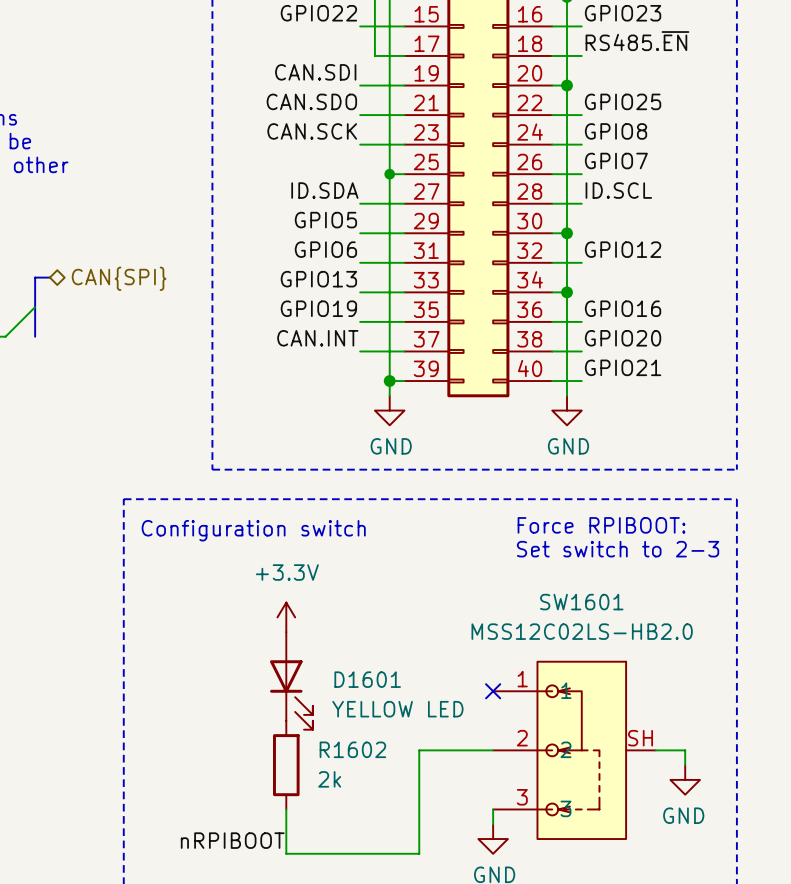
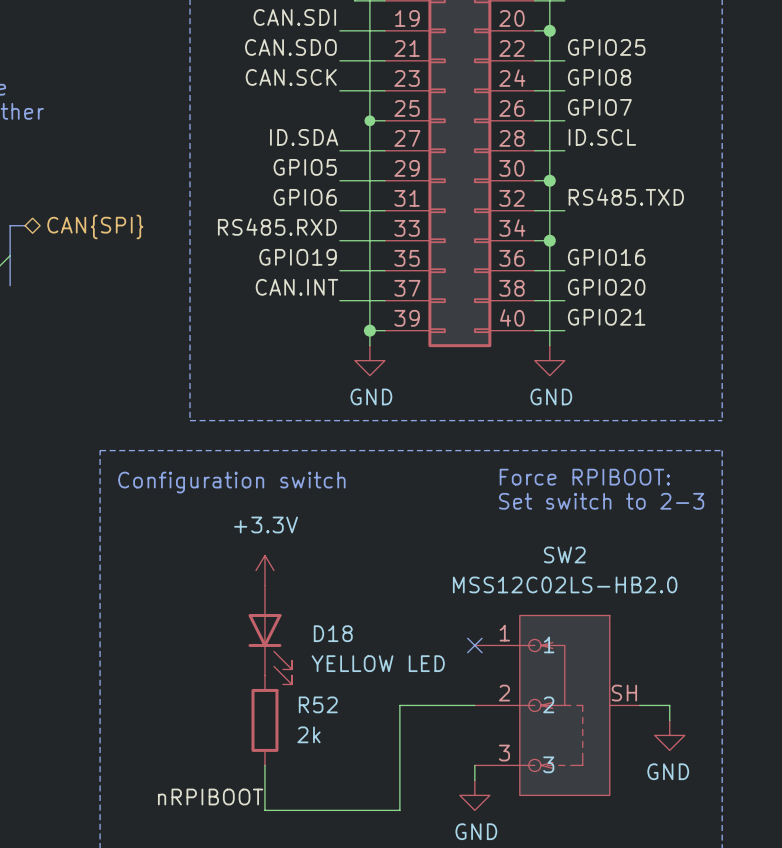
label: GPIO12 (623, 249) -> RS485.TXD (626, 197)
label: GPIO13 (318, 279) -> RS485.RXD (277, 226)
SW1601 name: SW1601 (581, 602) -> SW2 (564, 554)
D1601 name: D1601 (367, 679) -> D18 (333, 633)
R1602 name: R1602 (352, 749) -> R52 (318, 704)

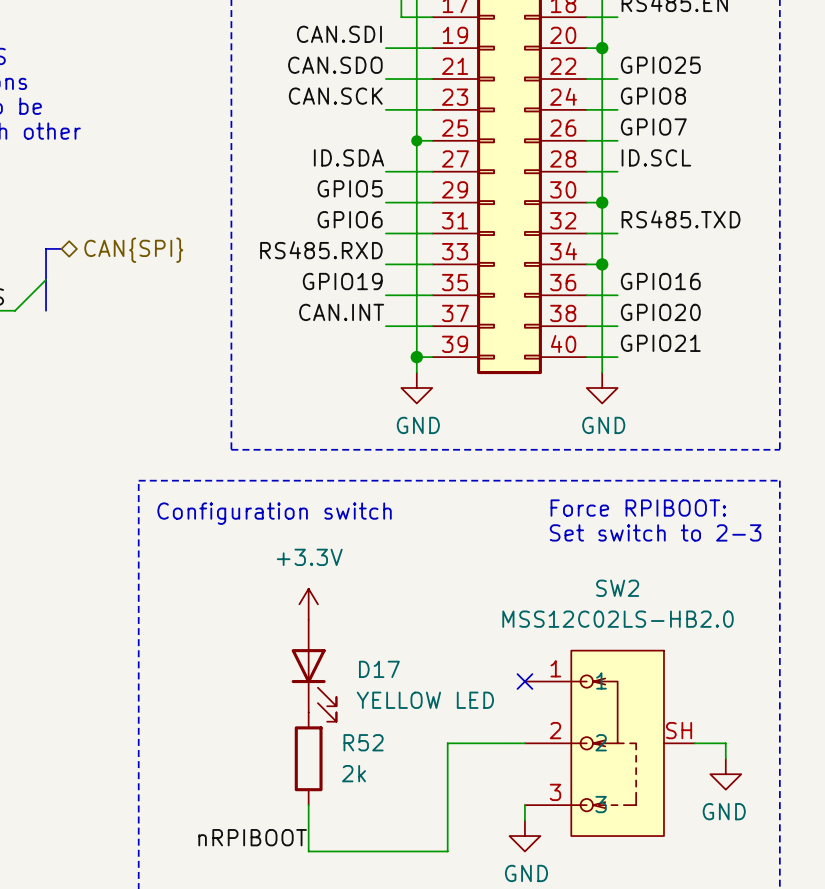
D18 name: D18 (333, 633) -> D17 (379, 669)

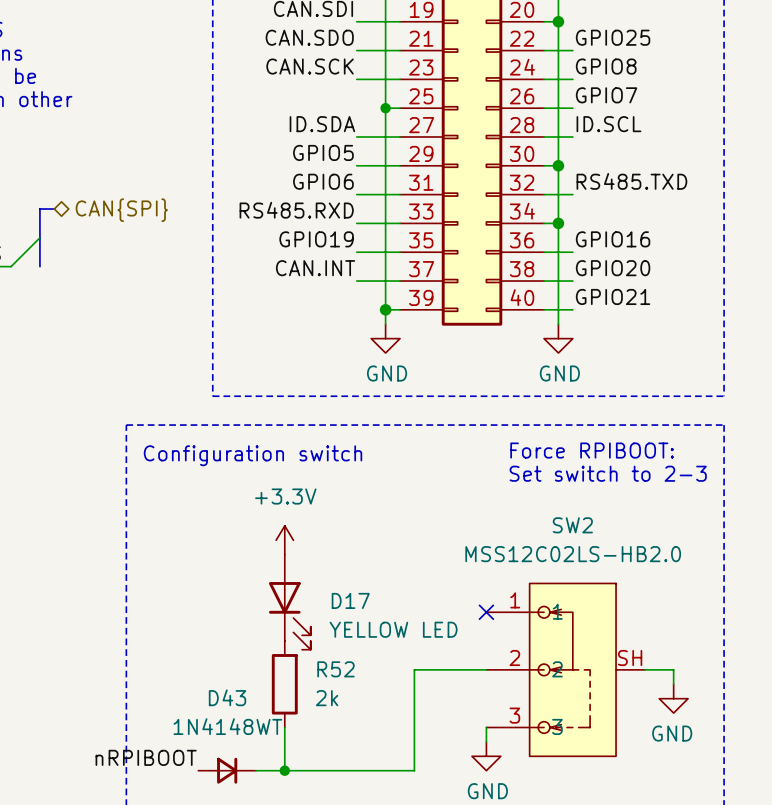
label position: nRPIBOOT (252, 837) -> nRPIBOOT (146, 757)
D43: none -> 1N4148WT (227, 770)
wire: none -> (255, 770) (284, 770)
junction: none -> (284, 770)

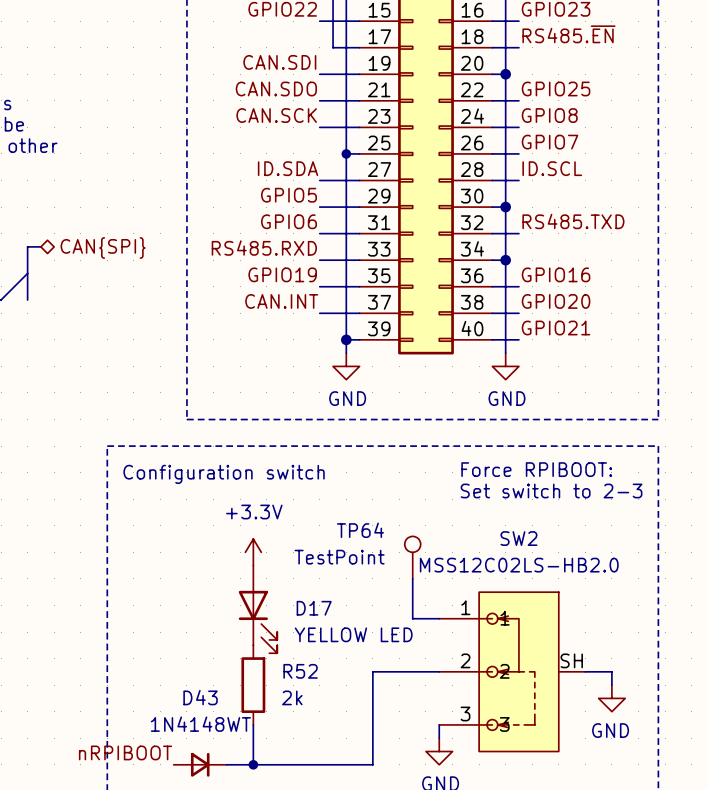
TP64: none -> TestPoint (412, 557)
wire: none -> (412, 578) (412, 618) (439, 618)
no-connect mark: (486, 612) -> none

